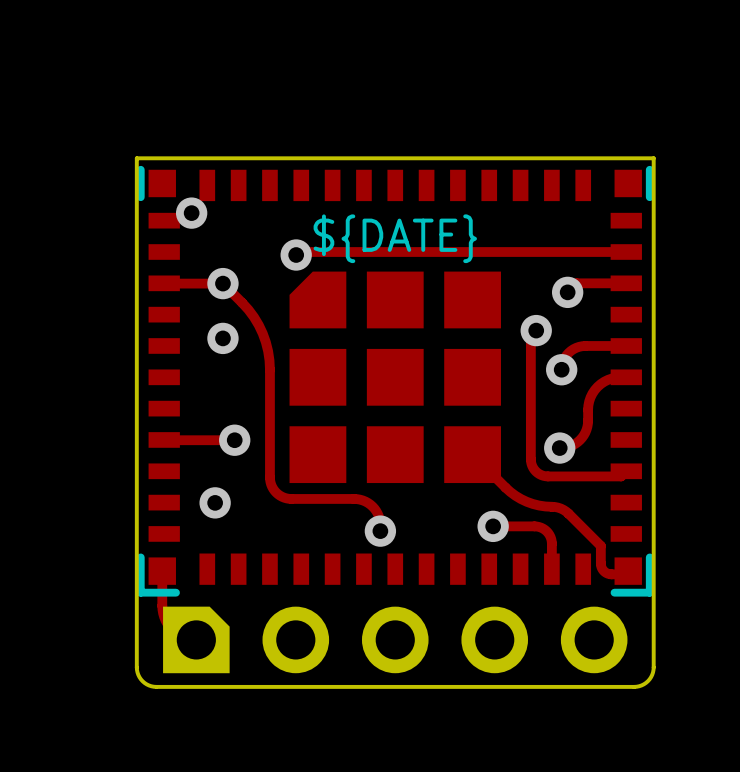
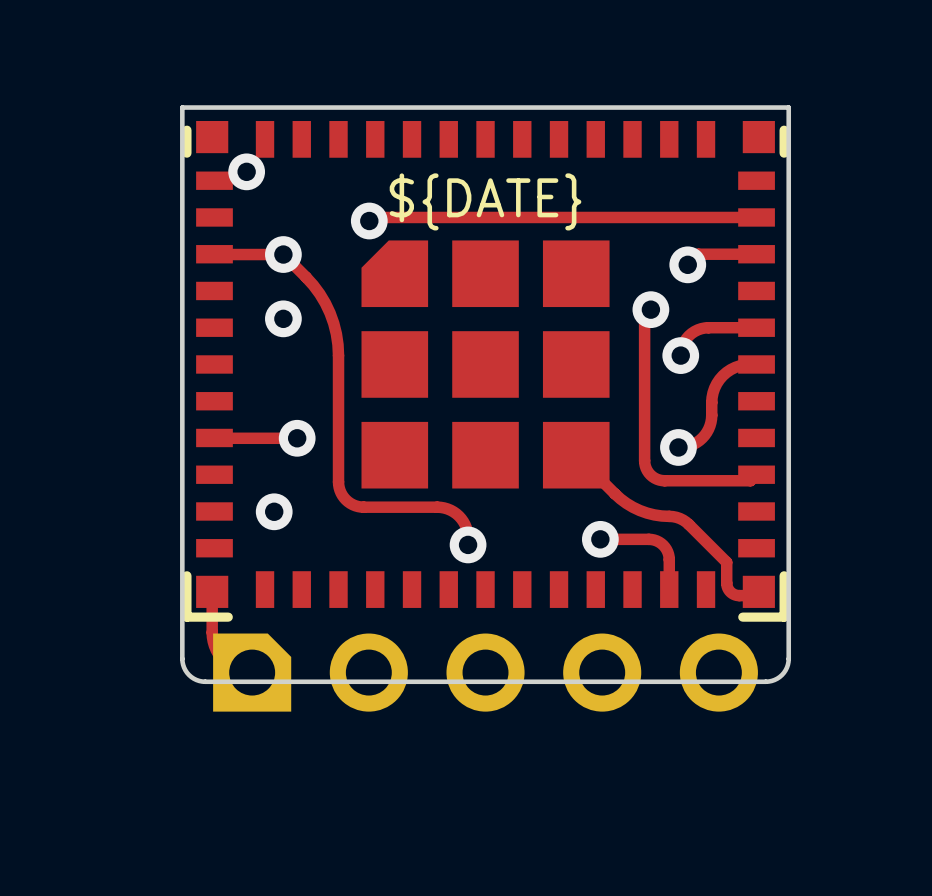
part footprint: [136, 165, 654, 597] -> [182, 121, 789, 622]
board edge: (136, 628) (137, 672) (144, 682) (156, 686) (636, 686) (646, 682) (653, 672) (653, 628) -> (182, 658) (184, 667) (189, 675) (196, 680) (205, 681) (765, 681) (774, 680) (781, 675) (786, 667) (788, 658)

